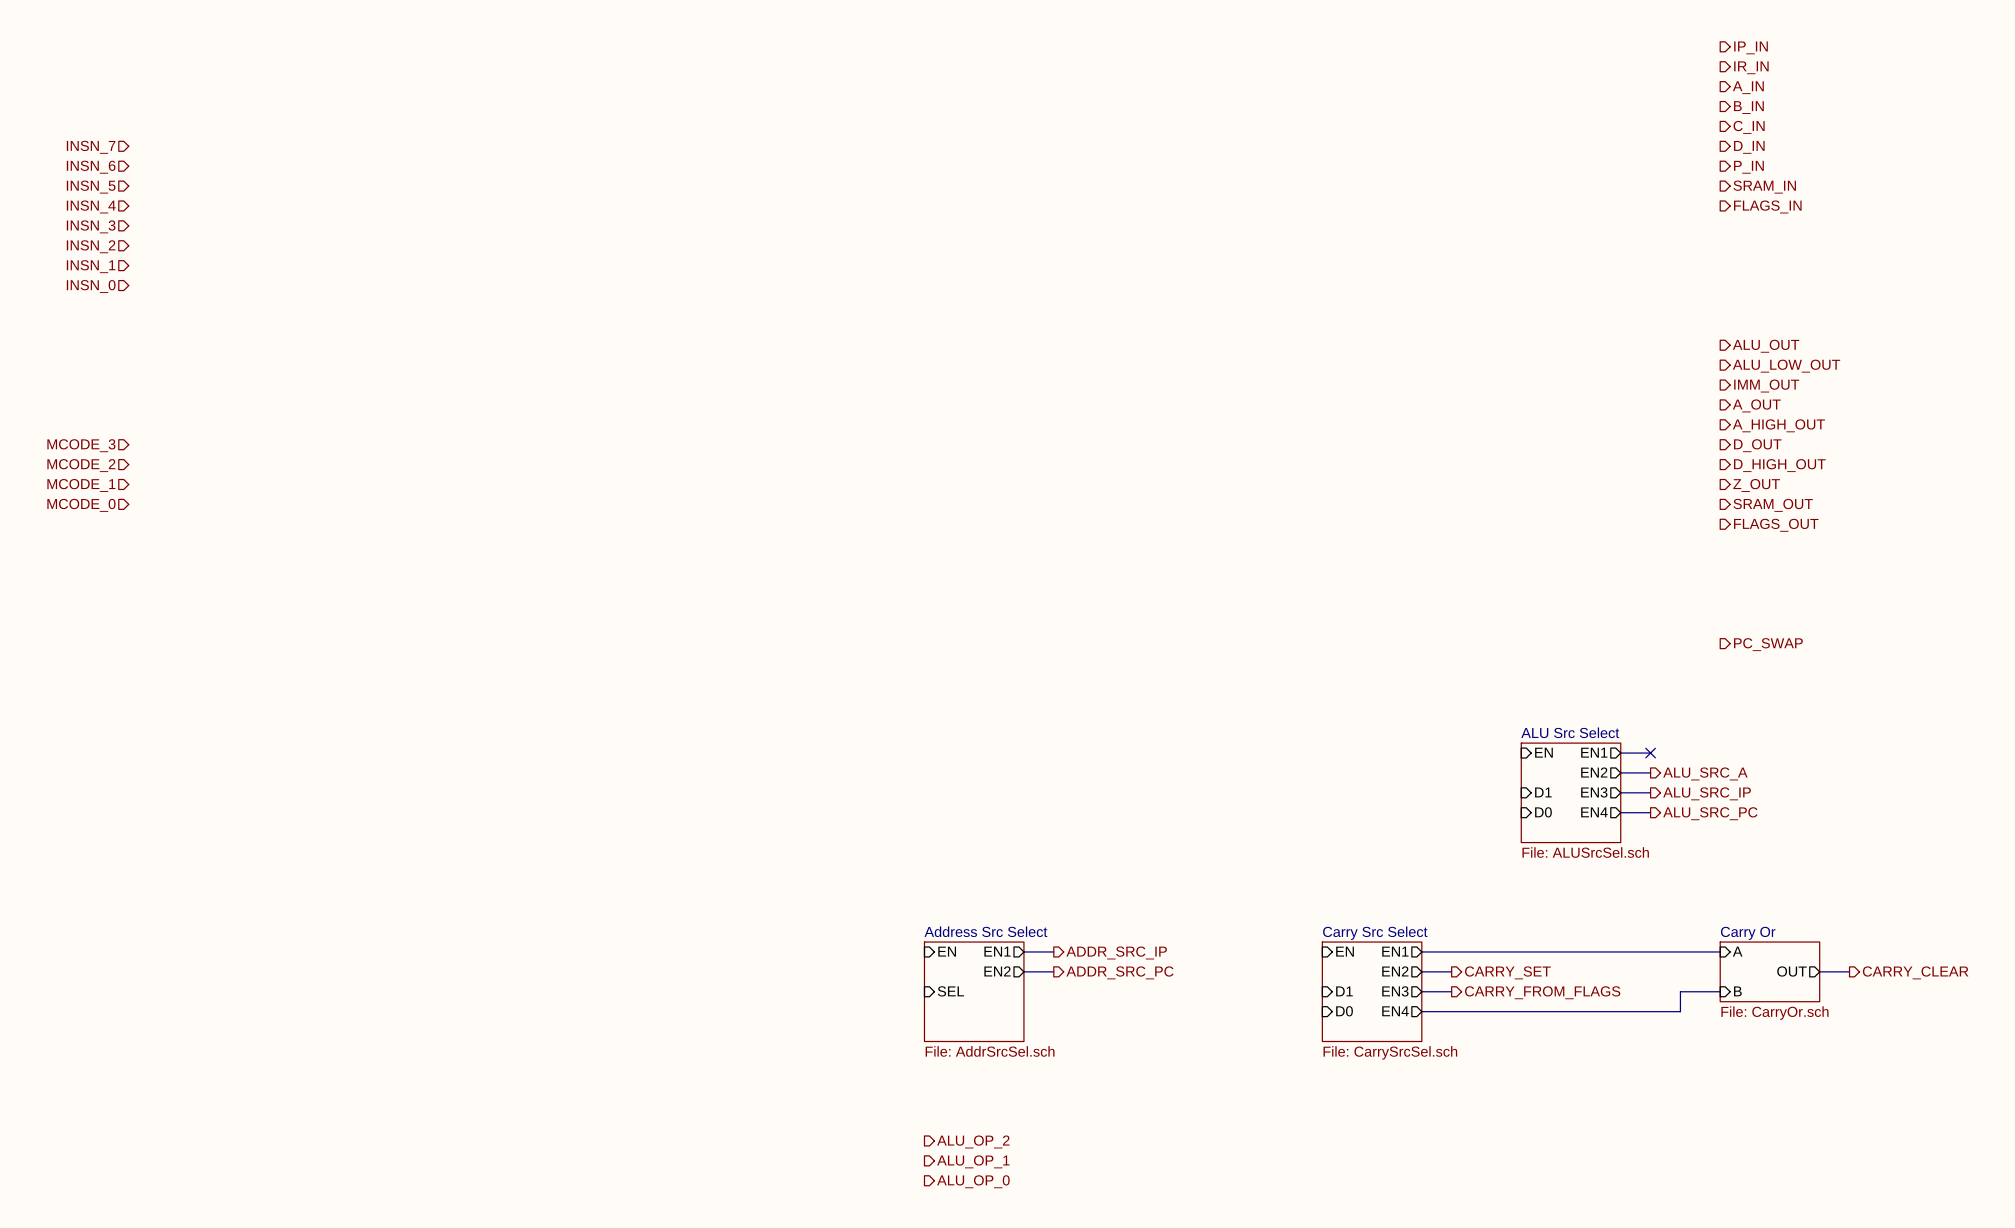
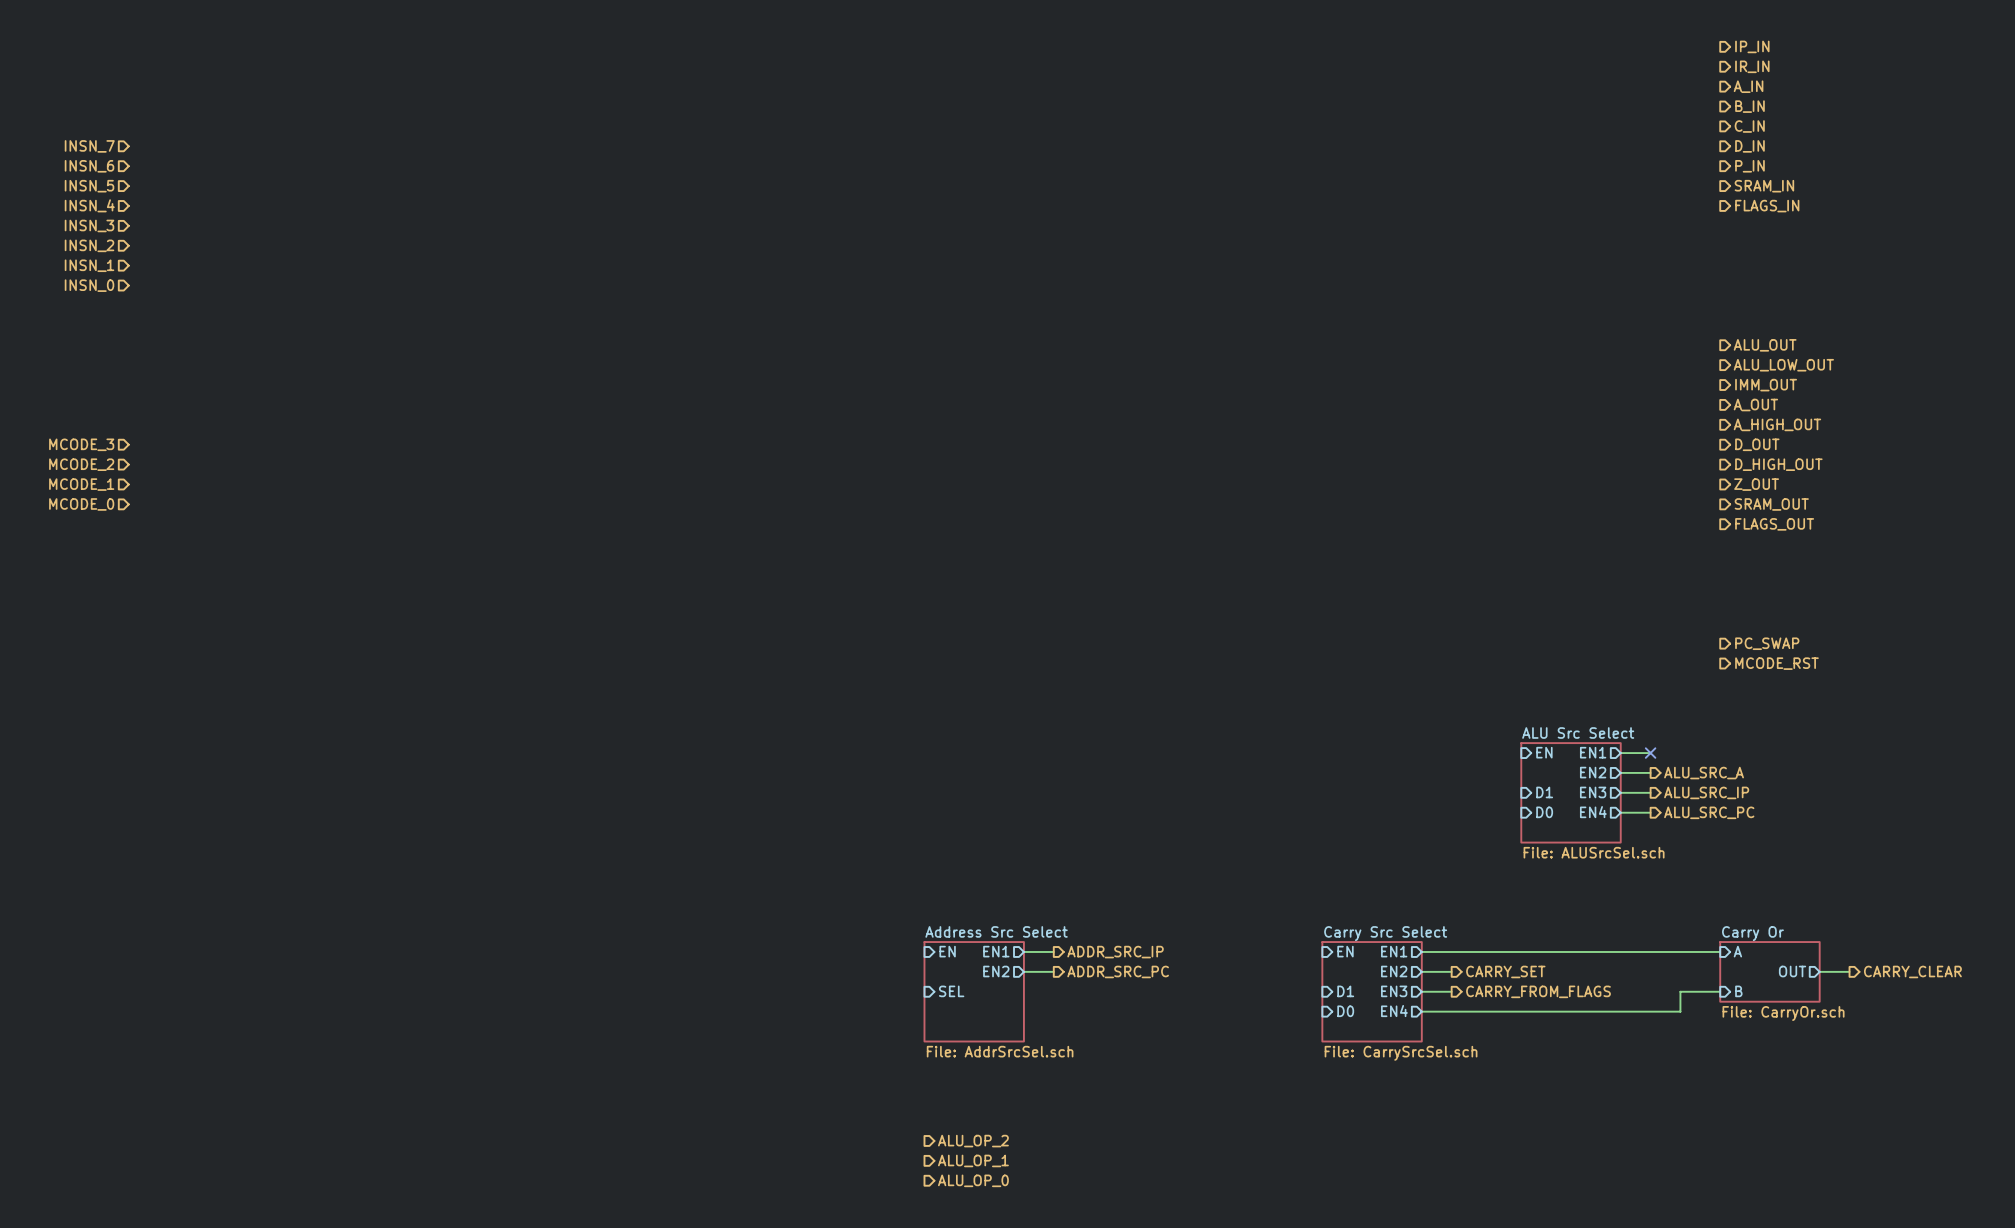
hierarchical label: none -> MCODE_RST (1776, 663)

